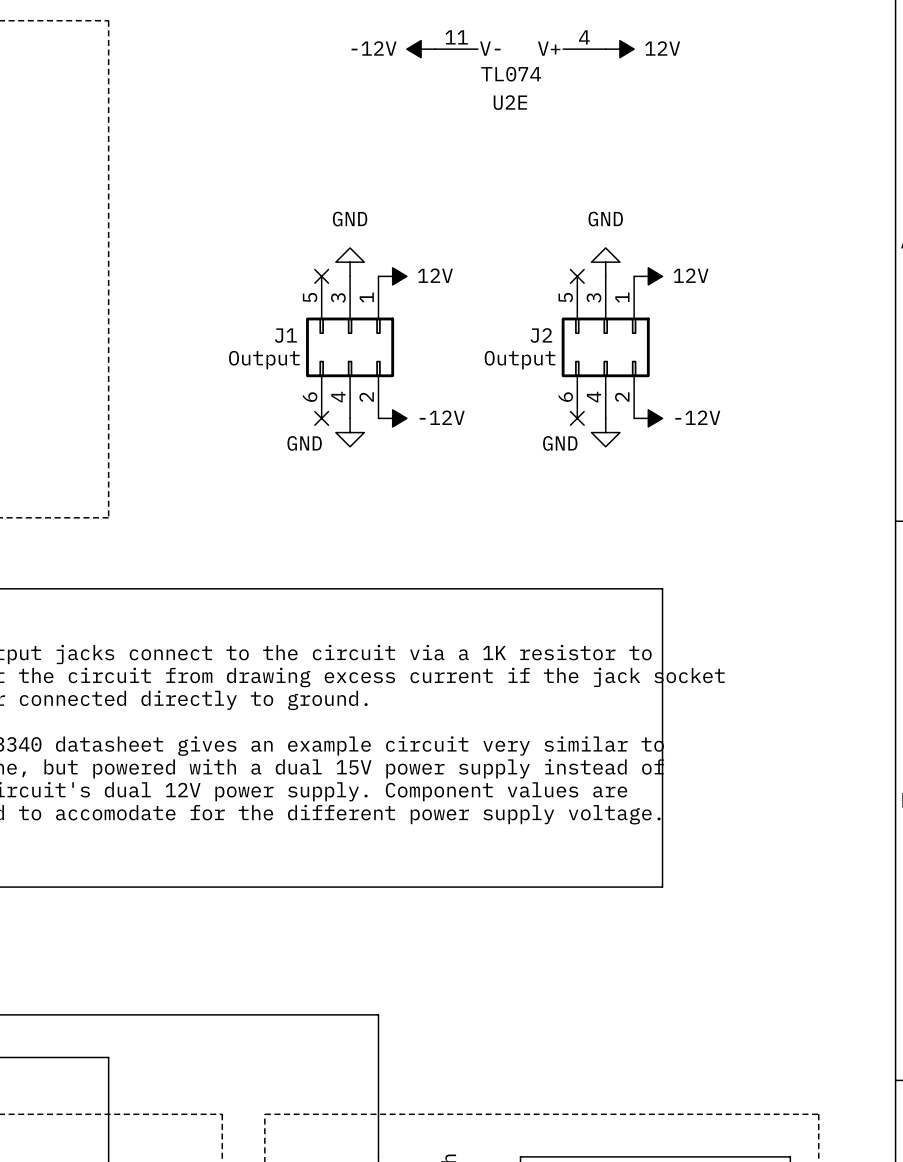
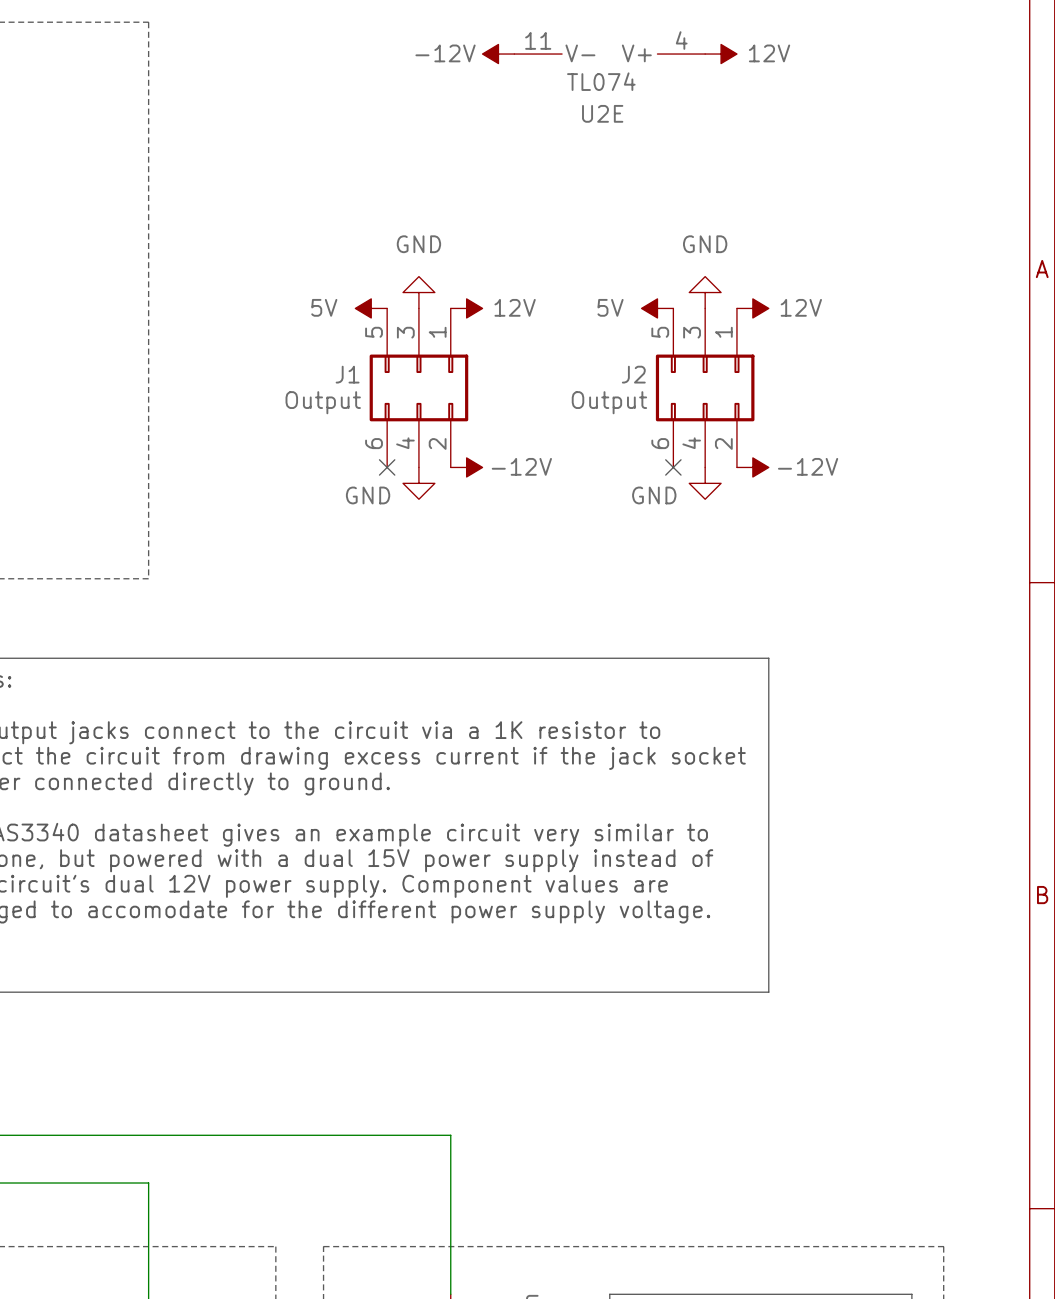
power symbol: none -> 5V (371, 308)
no-connect mark: (321, 276) -> none
power symbol: none -> 5V (657, 308)
no-connect mark: (577, 276) -> none

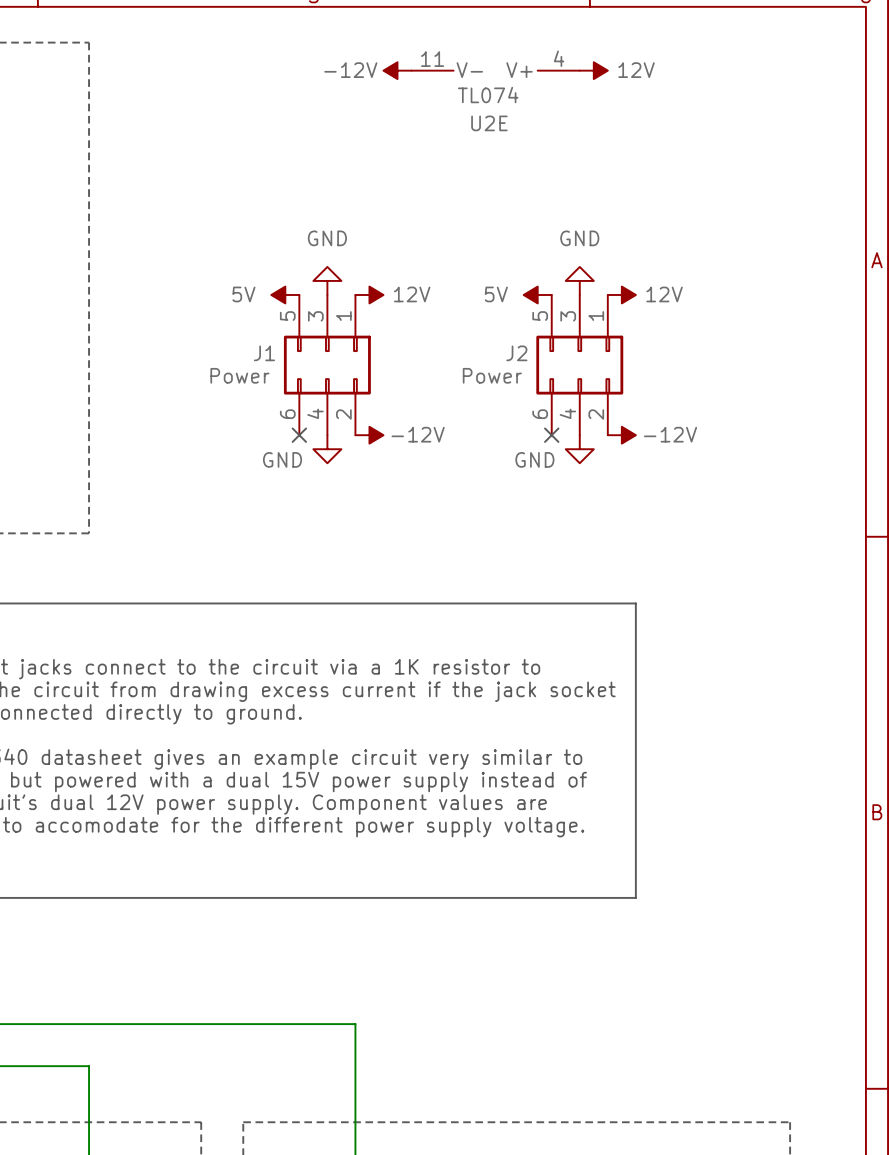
J1 value: Output (323, 402) -> Power (239, 375)
J2 value: Output (609, 402) -> Power (492, 375)

